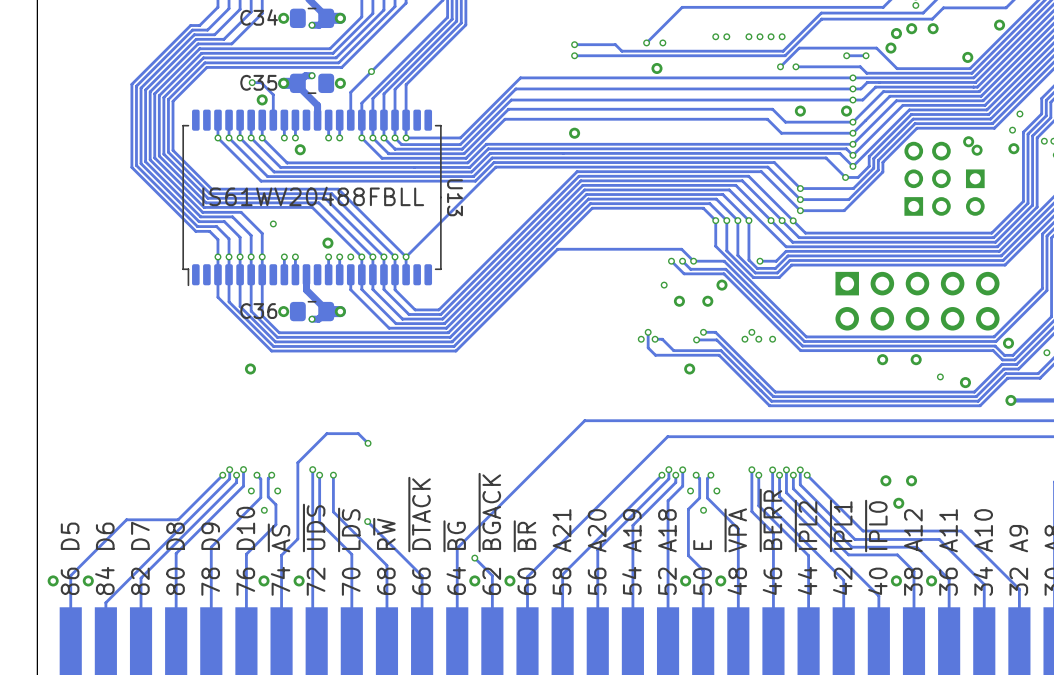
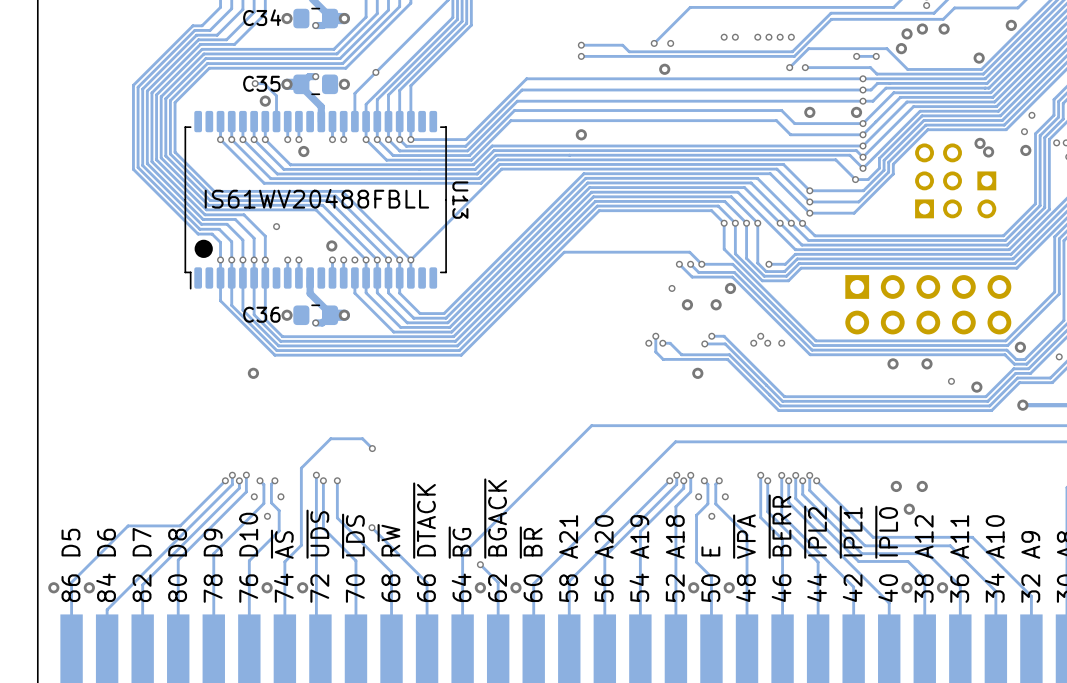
U13 footprint: [182, 109, 442, 287] -> [184, 110, 447, 290]

